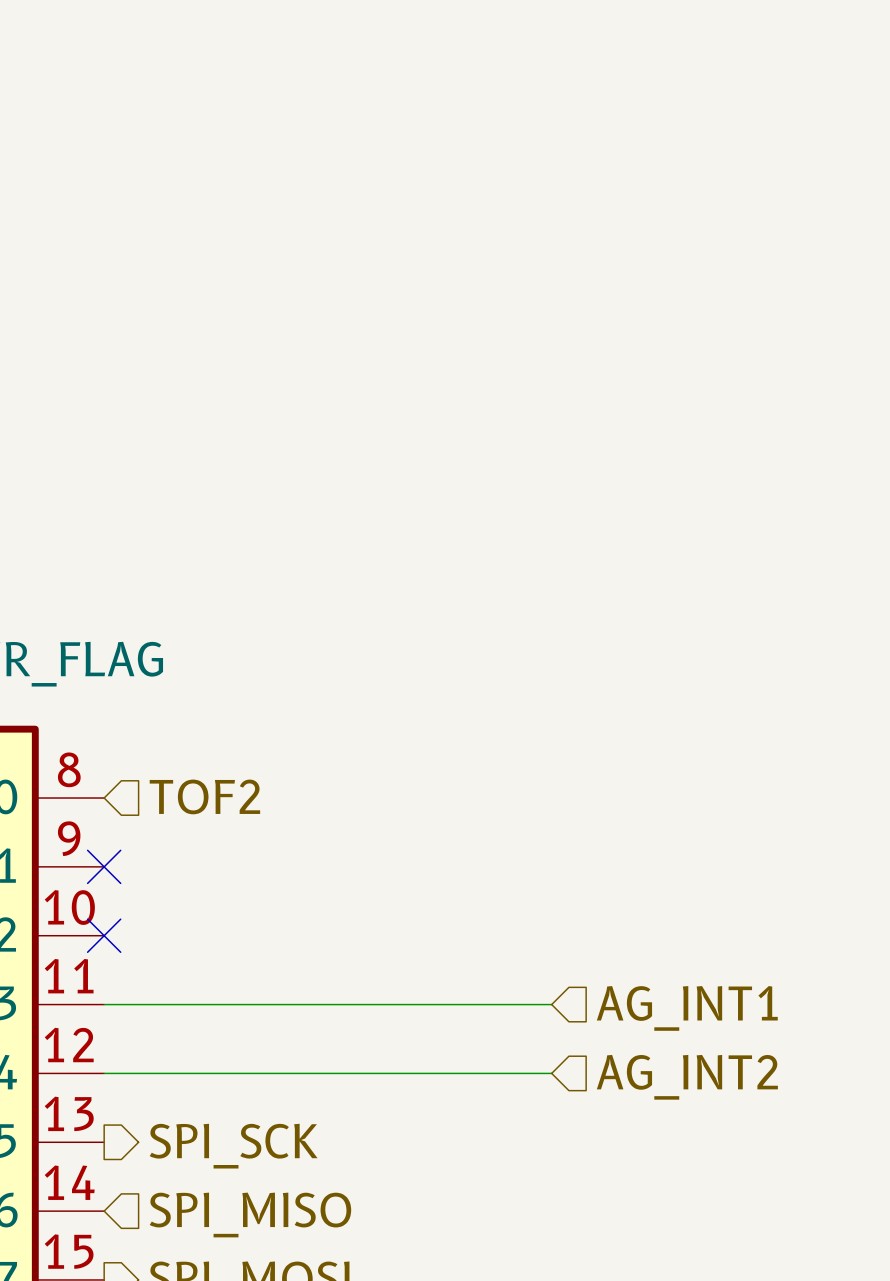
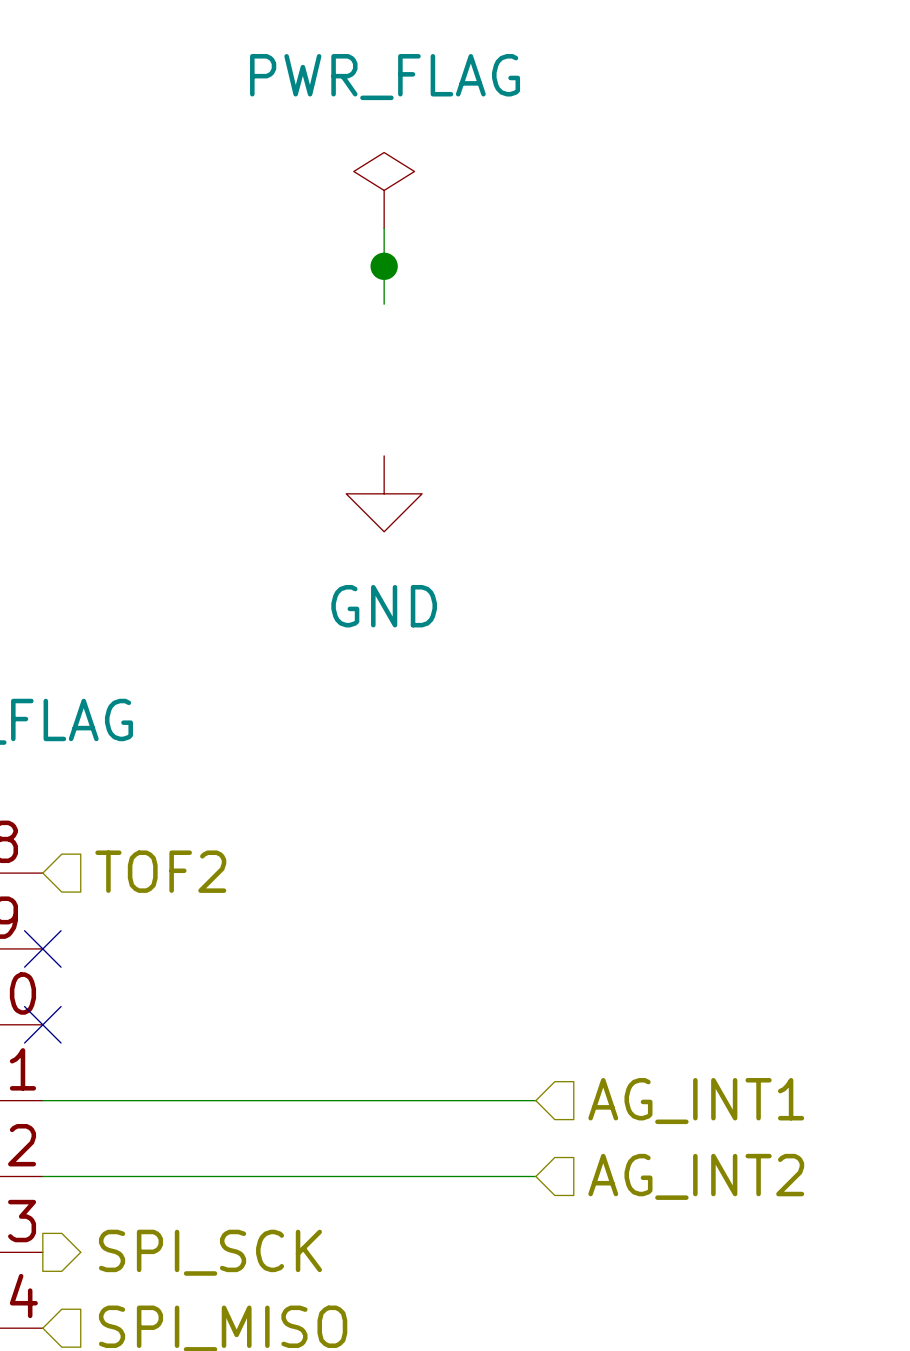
power symbol: none -> PWR_FLAG (384, 190)
wire: none -> (384, 228) (384, 304)
junction: none -> (384, 266)
power symbol: none -> GND (384, 493)

